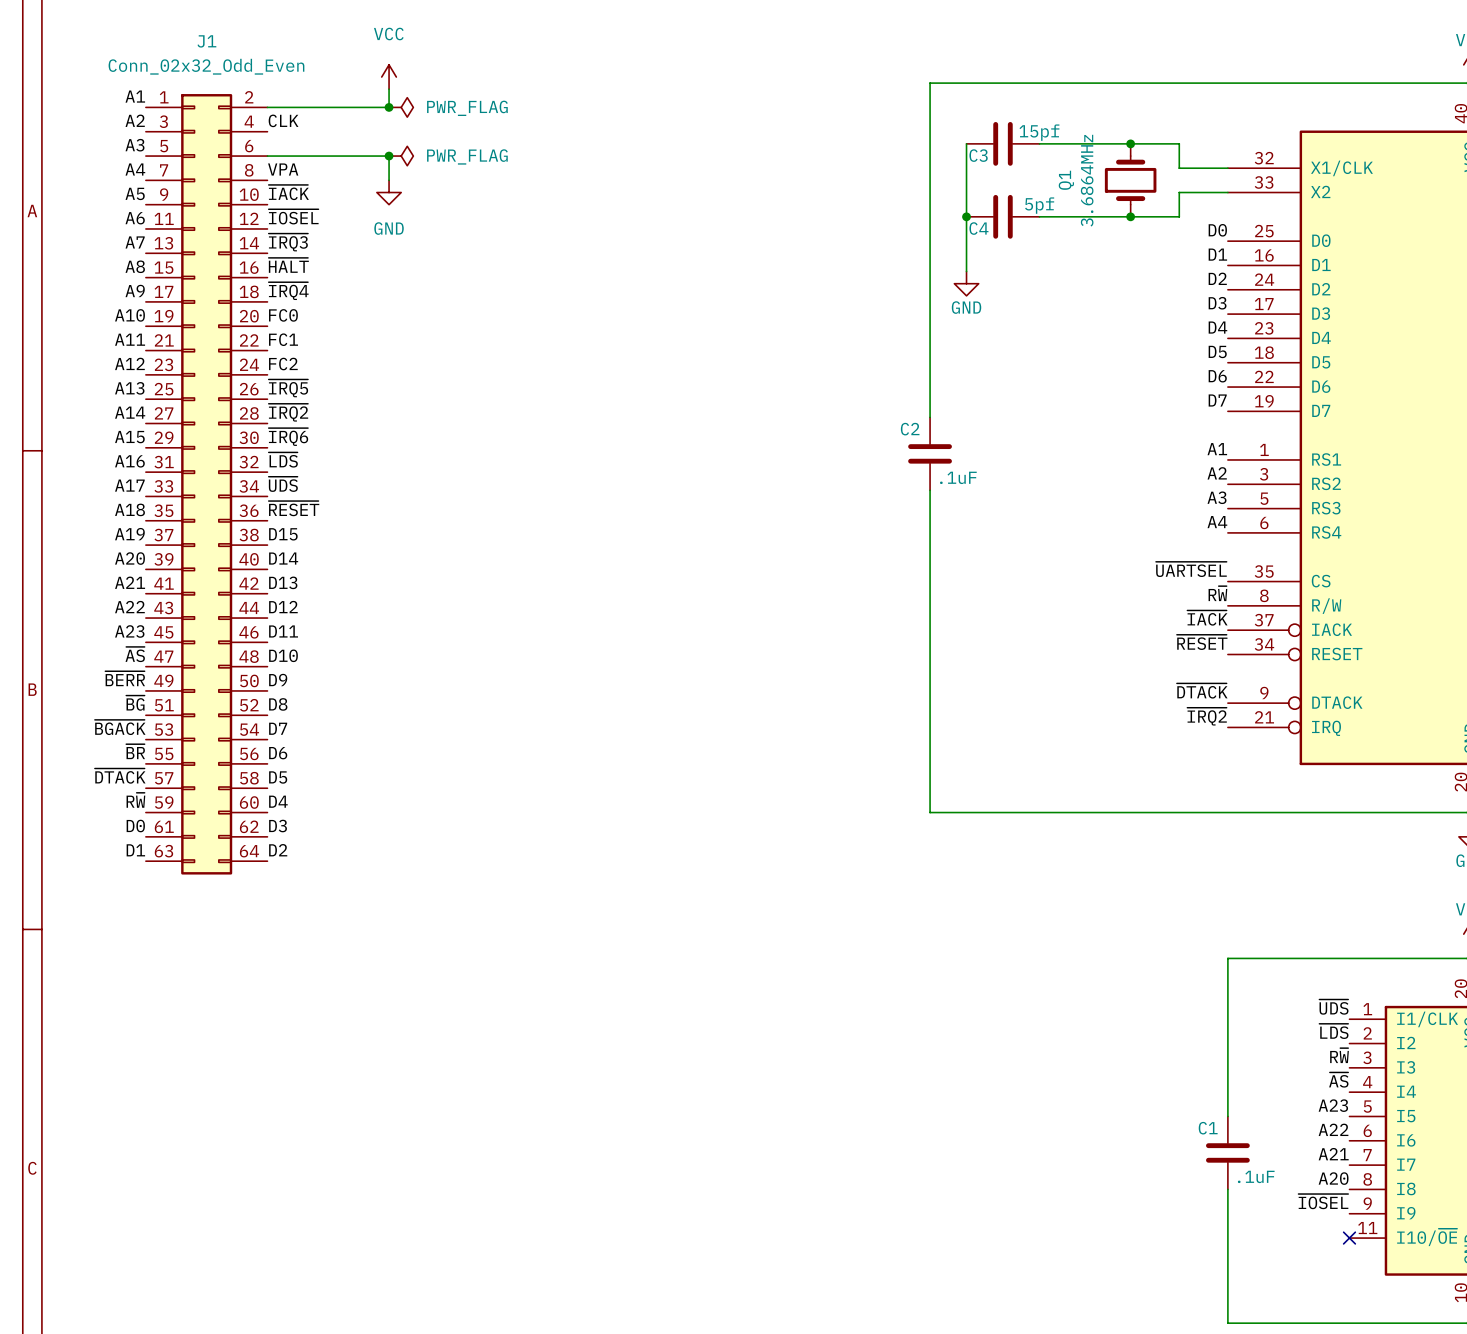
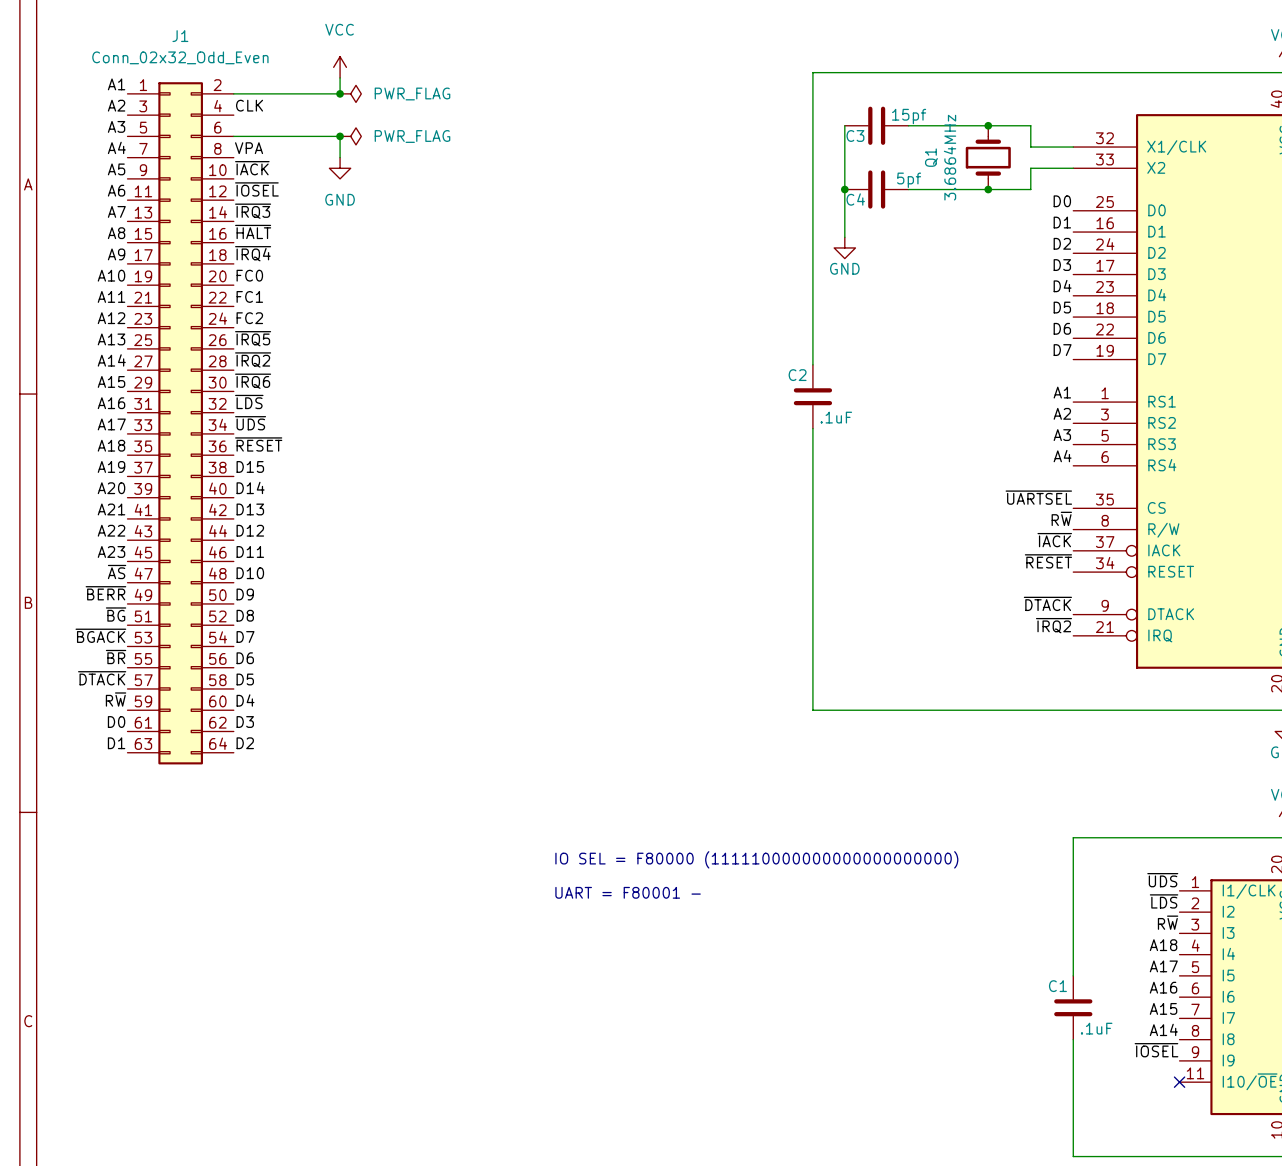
text: none -> IO SEL = F80000 (111110000000000000000000) (756, 859)
text: none -> UART = F80001 - (628, 892)
label: ~{AS} (1338, 1080) -> A18 (1163, 945)
label: A23 (1333, 1105) -> A17 (1163, 966)
label: A22 (1333, 1129) -> A16 (1163, 987)
label: A21 (1333, 1154) -> A15 (1163, 1008)
label: A20 (1333, 1178) -> A14 (1163, 1029)

